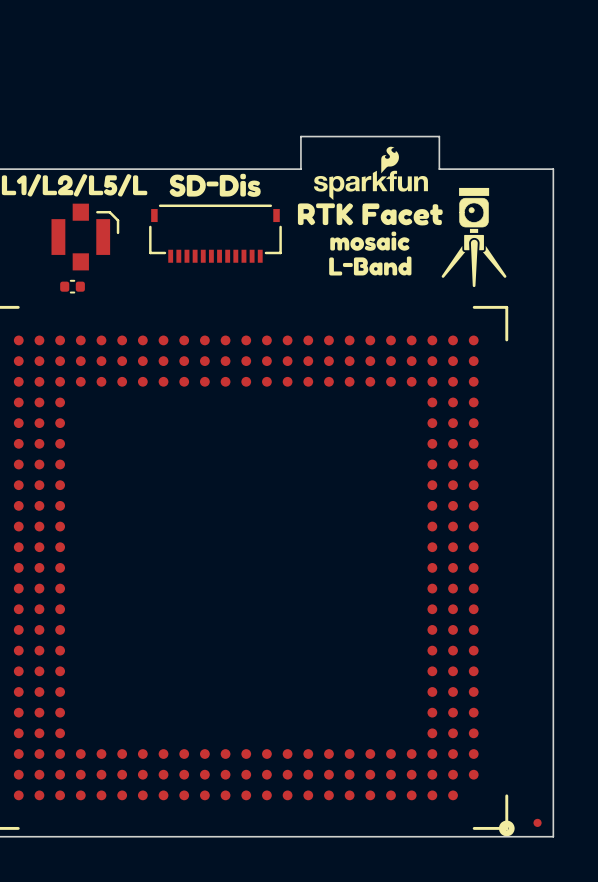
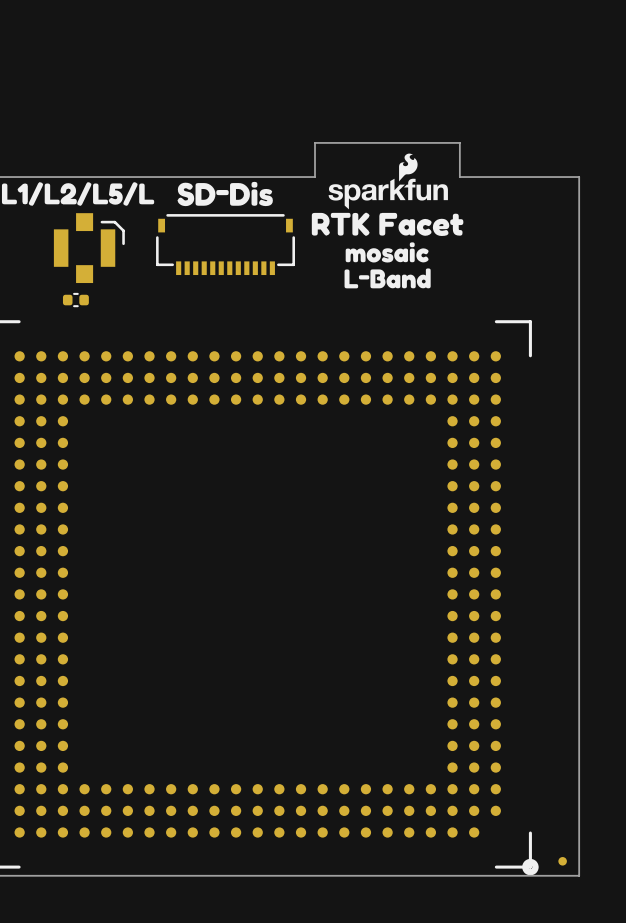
drawing: [441, 187, 507, 288] -> none

